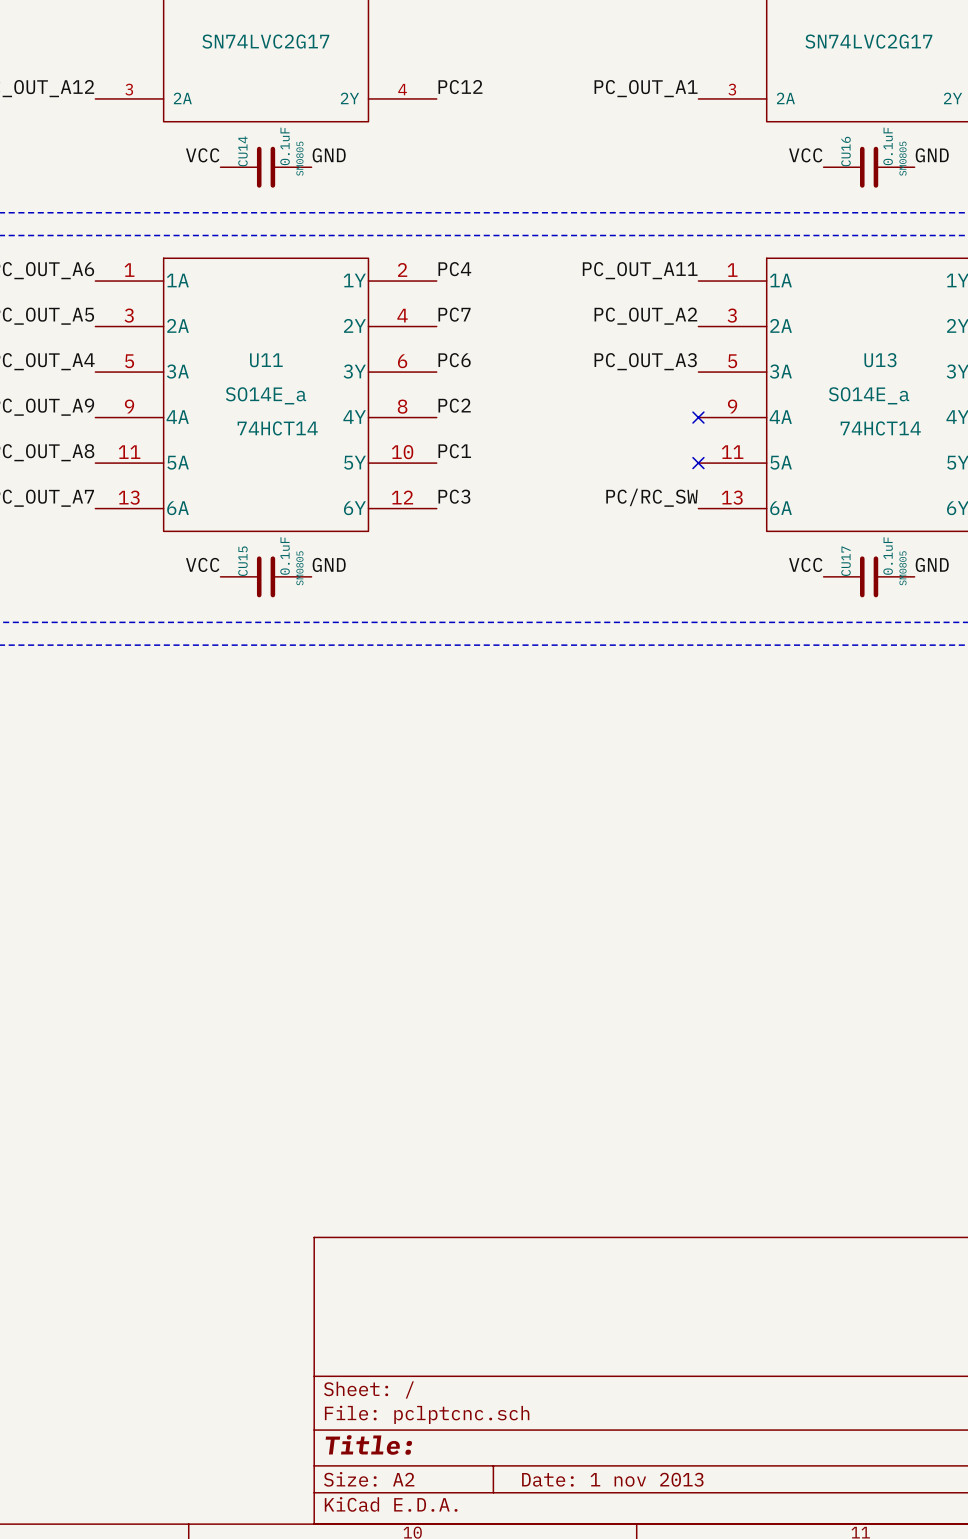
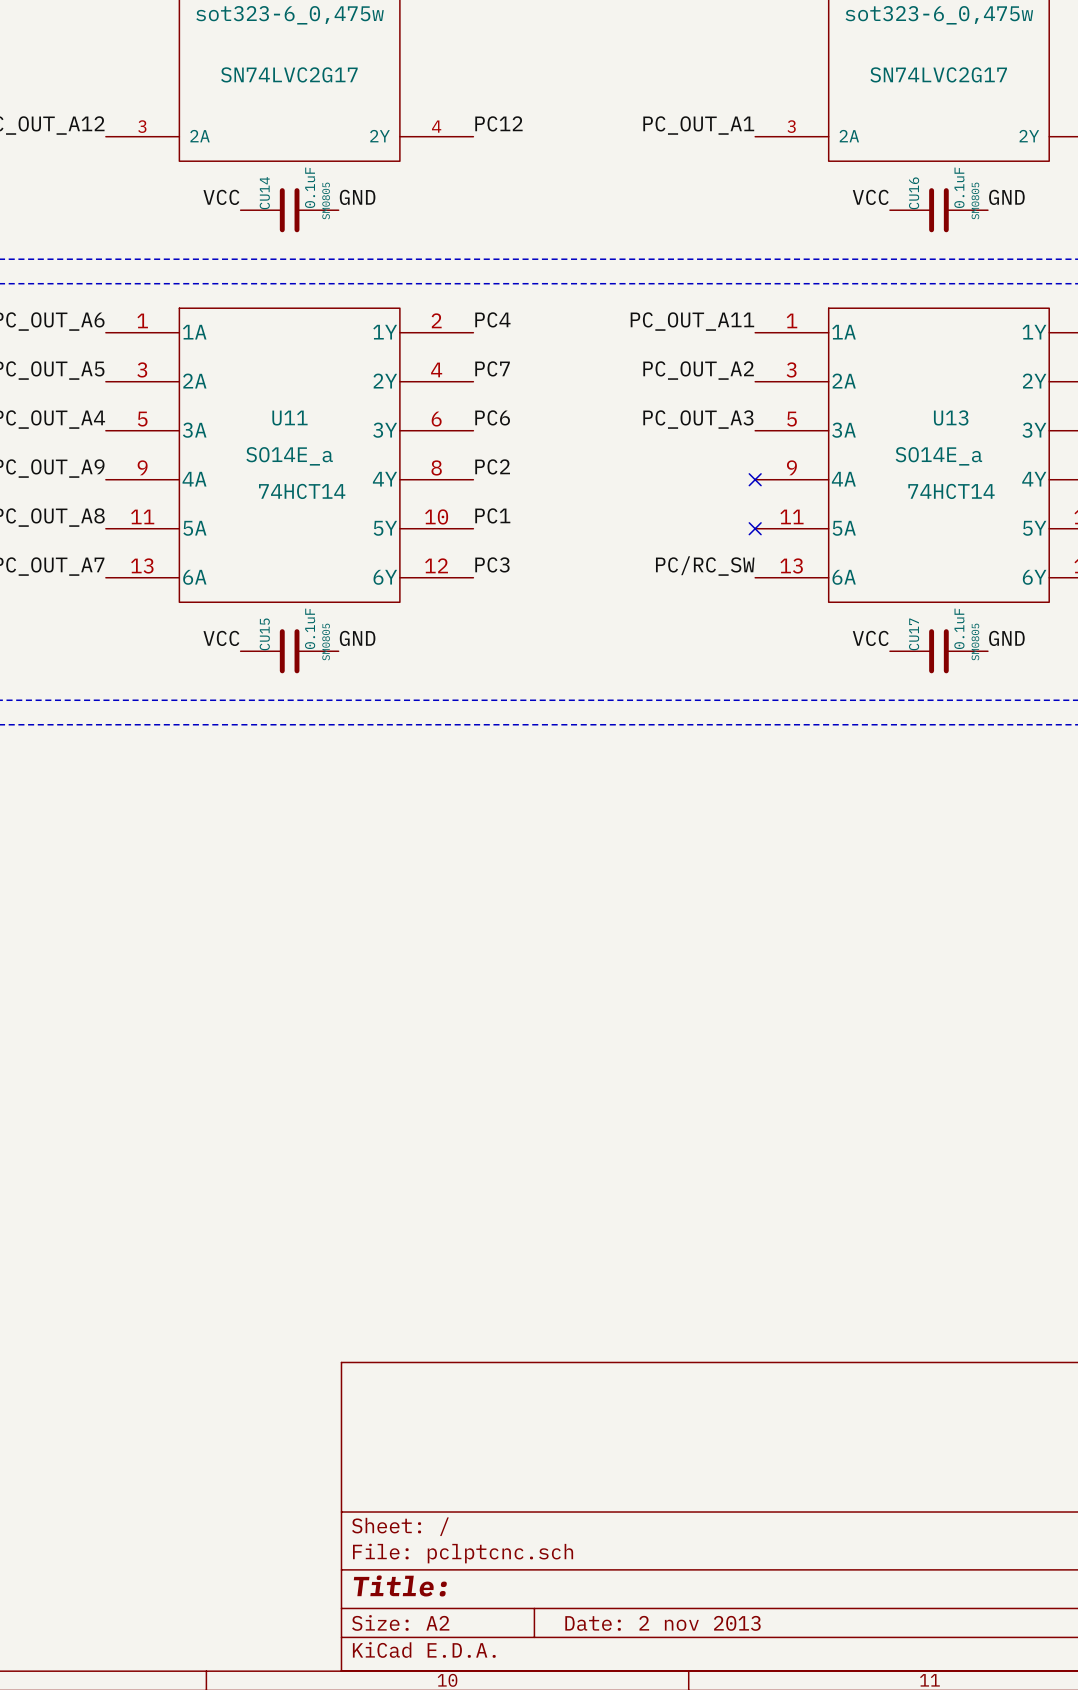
title block: Date: 1 nov 2013 (612, 1479) -> Date: 2 nov 2013 (663, 1623)

